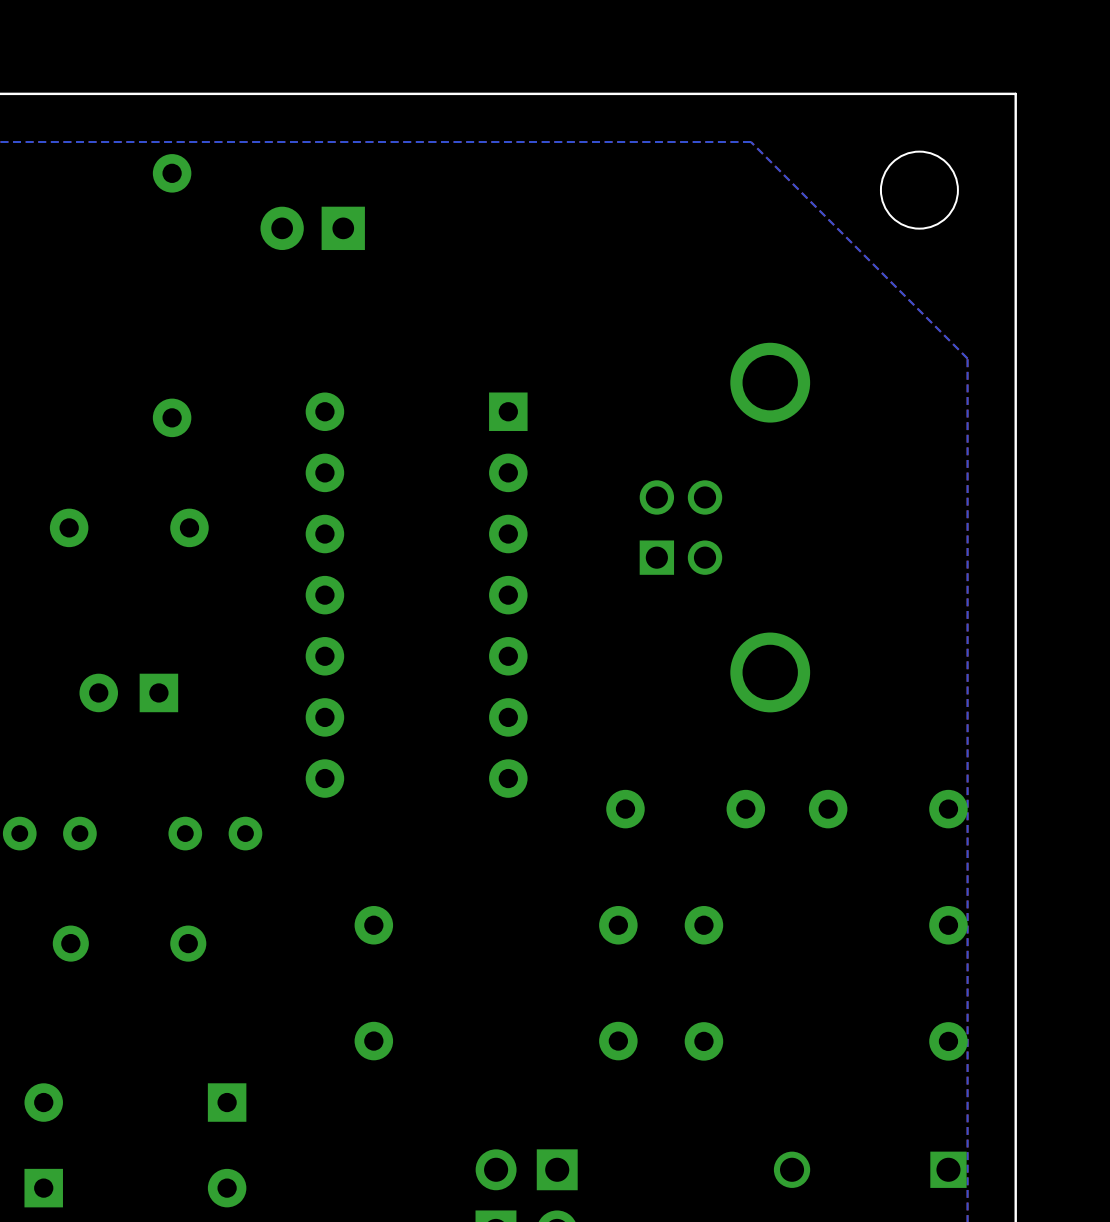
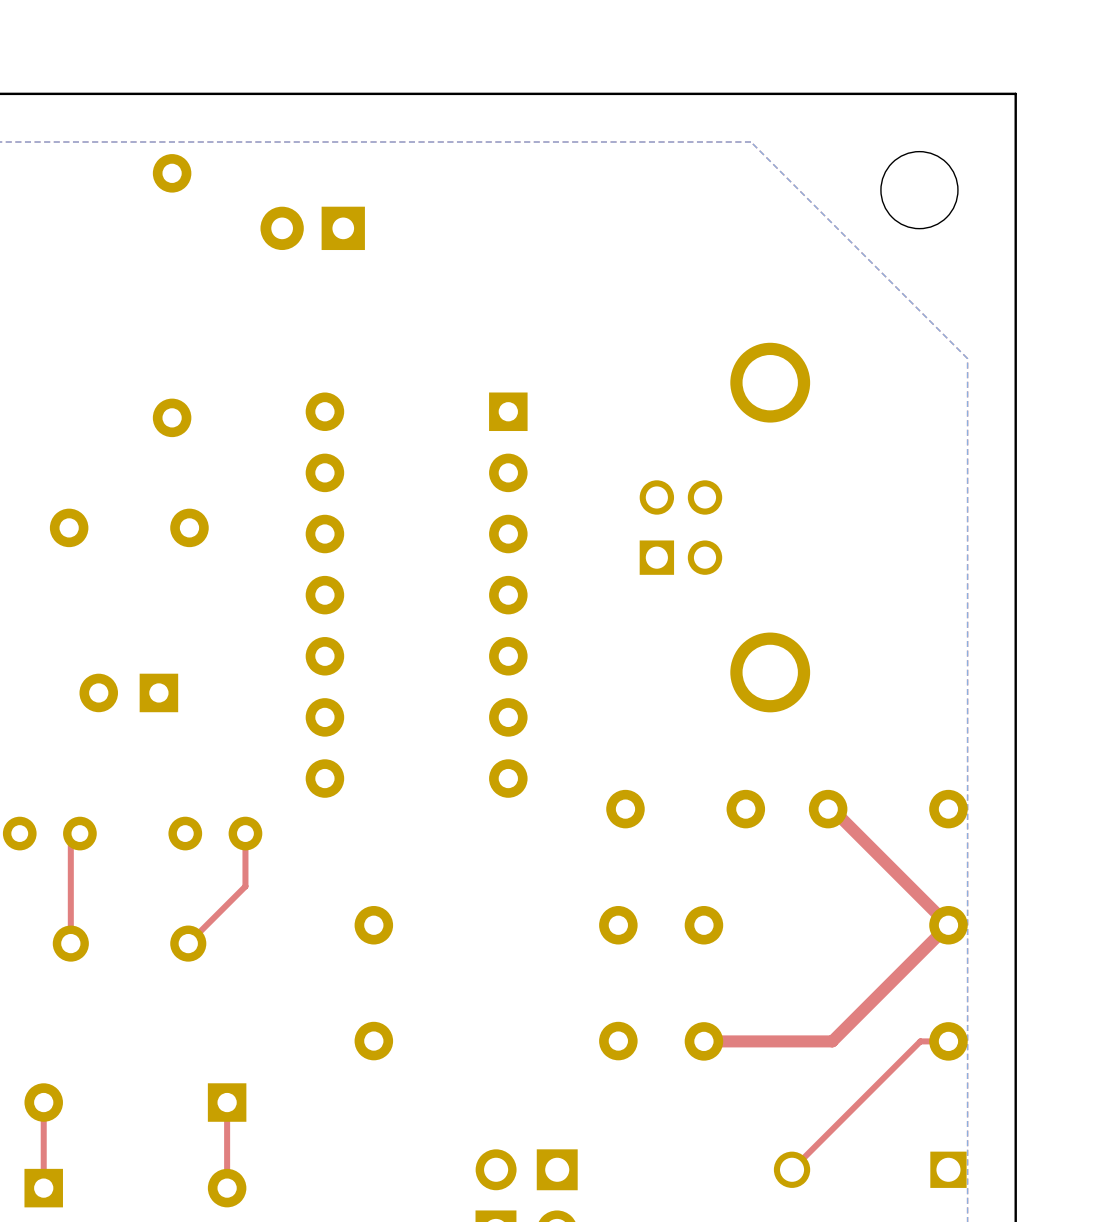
top track: none -> (828, 809) (832, 809) (948, 925) (832, 1041) (703, 1041)
top track: none -> (79, 833) (70, 842) (70, 943)
top track: none -> (245, 833) (245, 886) (188, 943)
top track: none -> (948, 1041) (920, 1041) (792, 1169)
top track: none -> (43, 1102) (43, 1188)
top track: none -> (227, 1102) (227, 1188)

